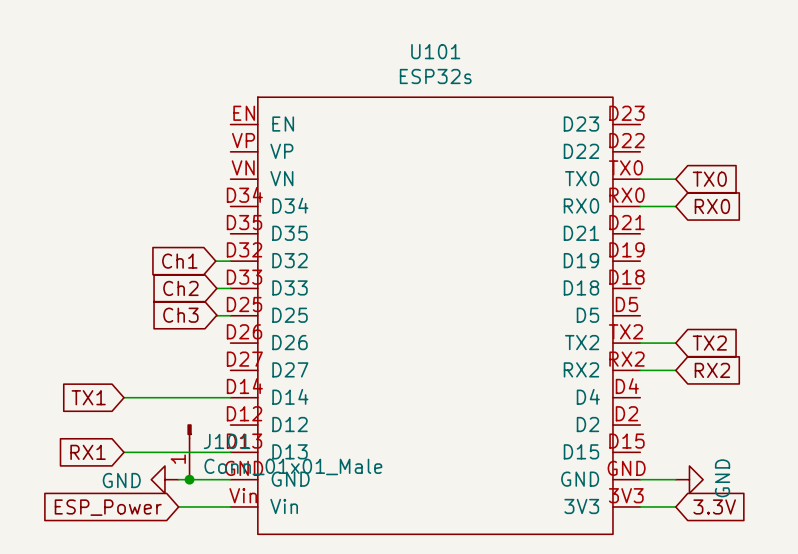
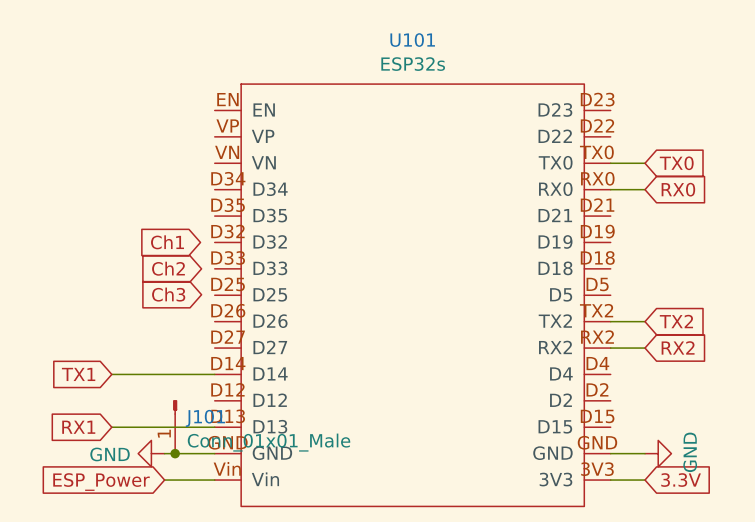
wire: (215, 261) (230, 261) -> none
wire: (216, 288) (230, 288) -> none
wire: (216, 315) (230, 315) -> none

